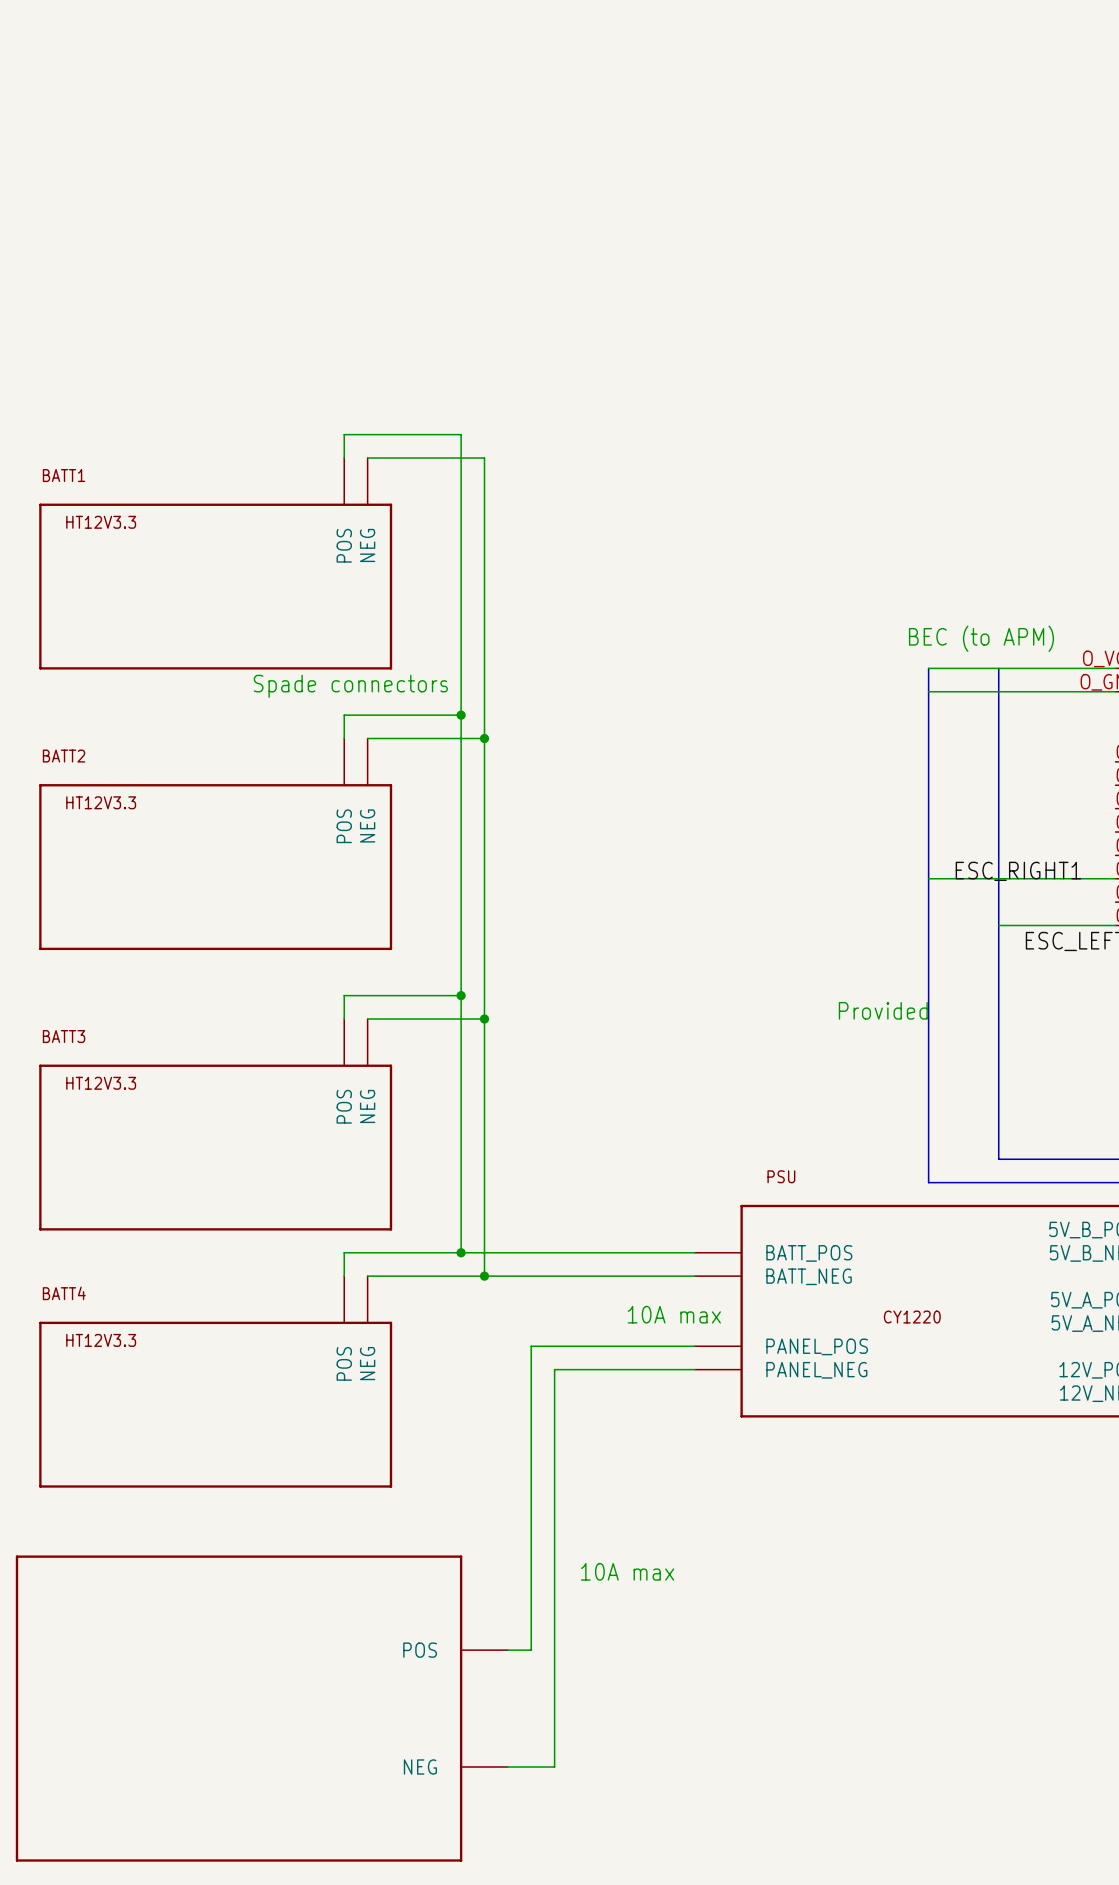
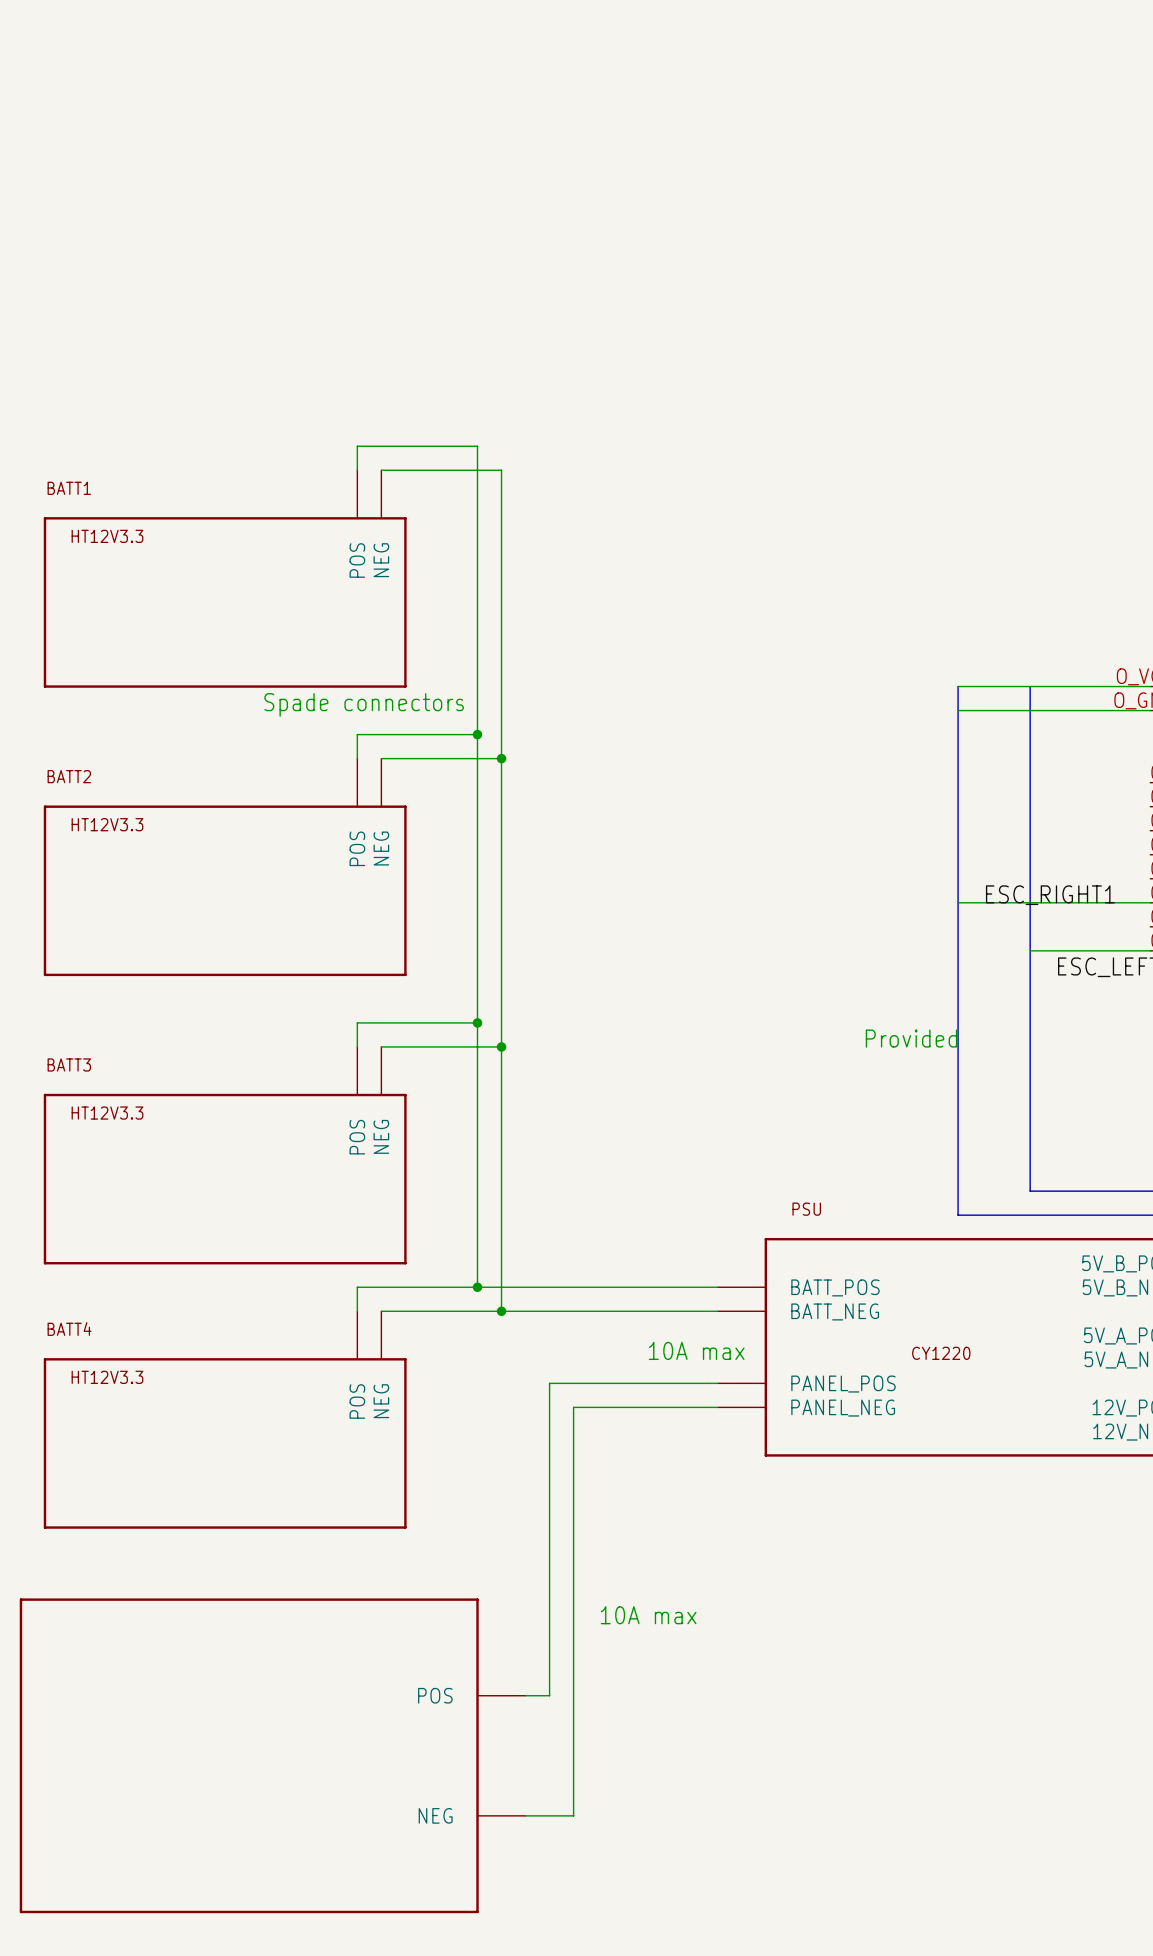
text: BEC (to APM) (981, 638) -> none

